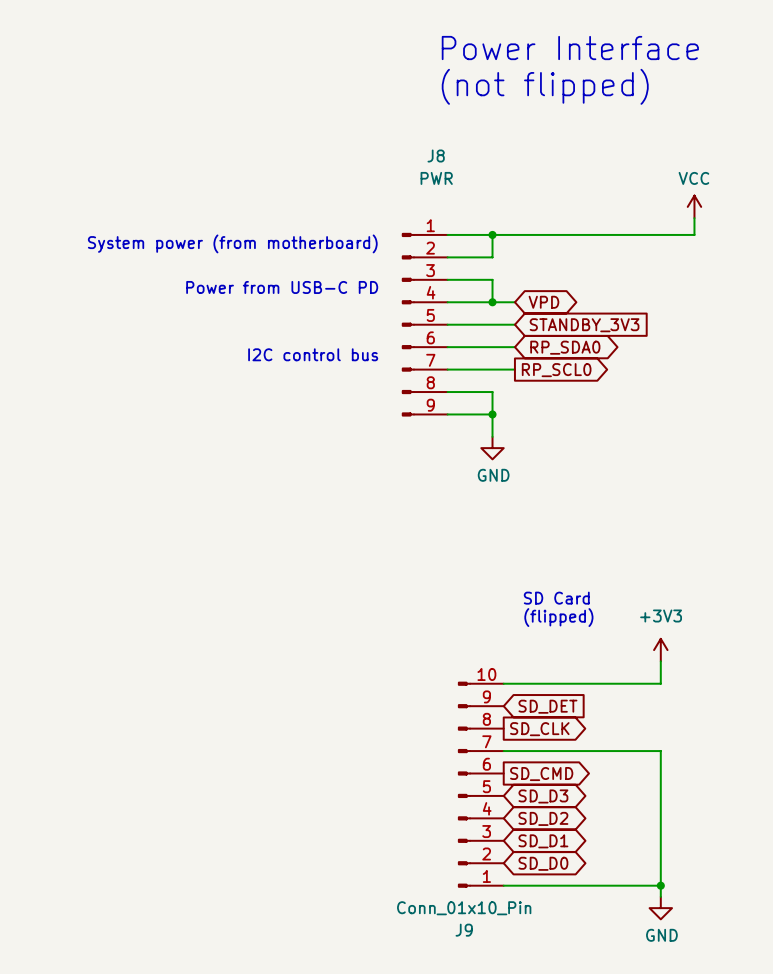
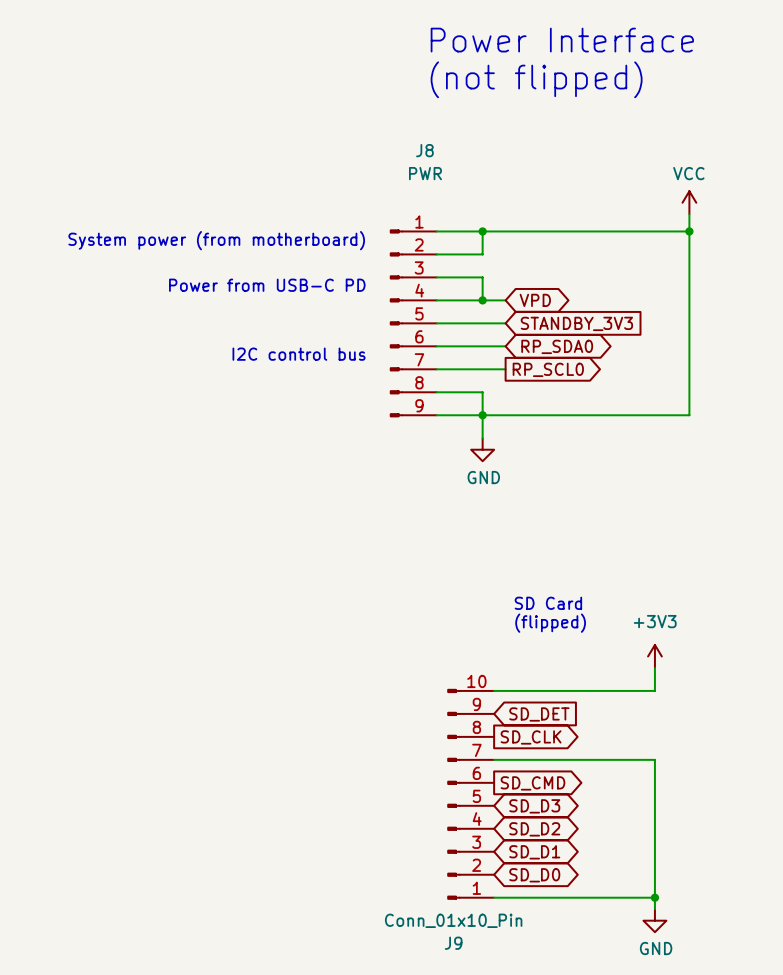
wire: none -> (689, 231) (689, 415) (482, 415)
junction: none -> (689, 231)

